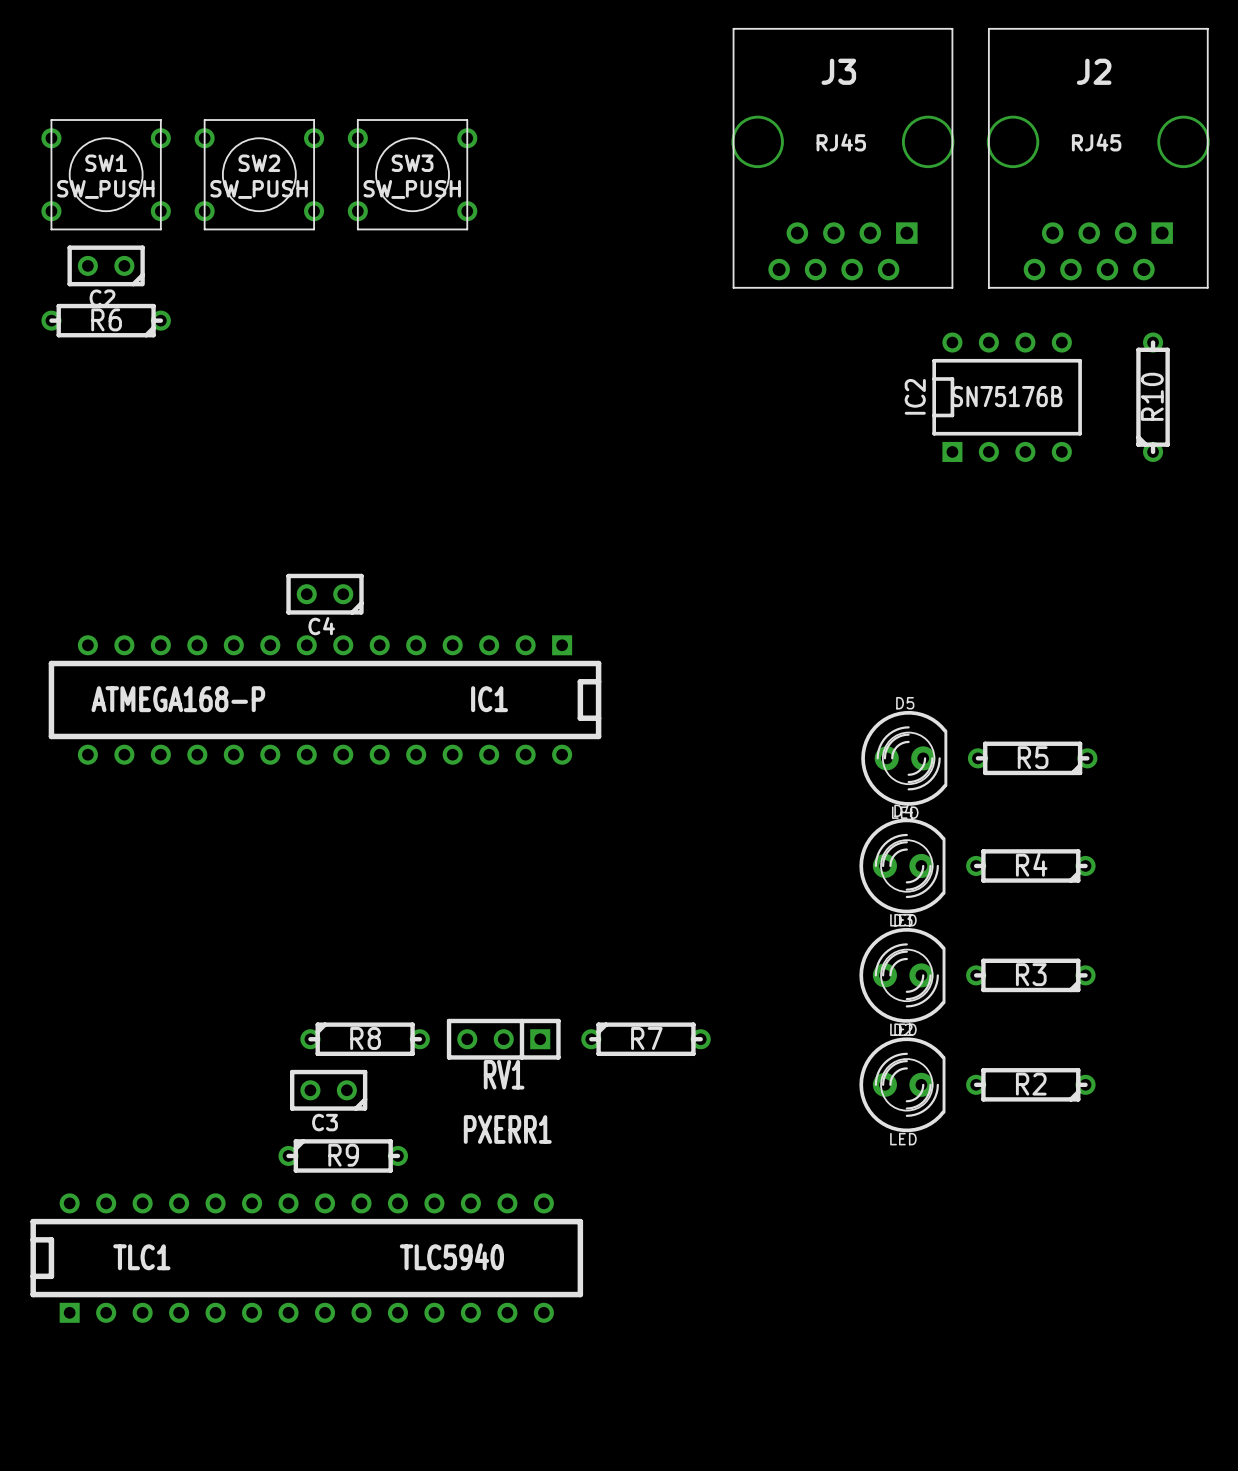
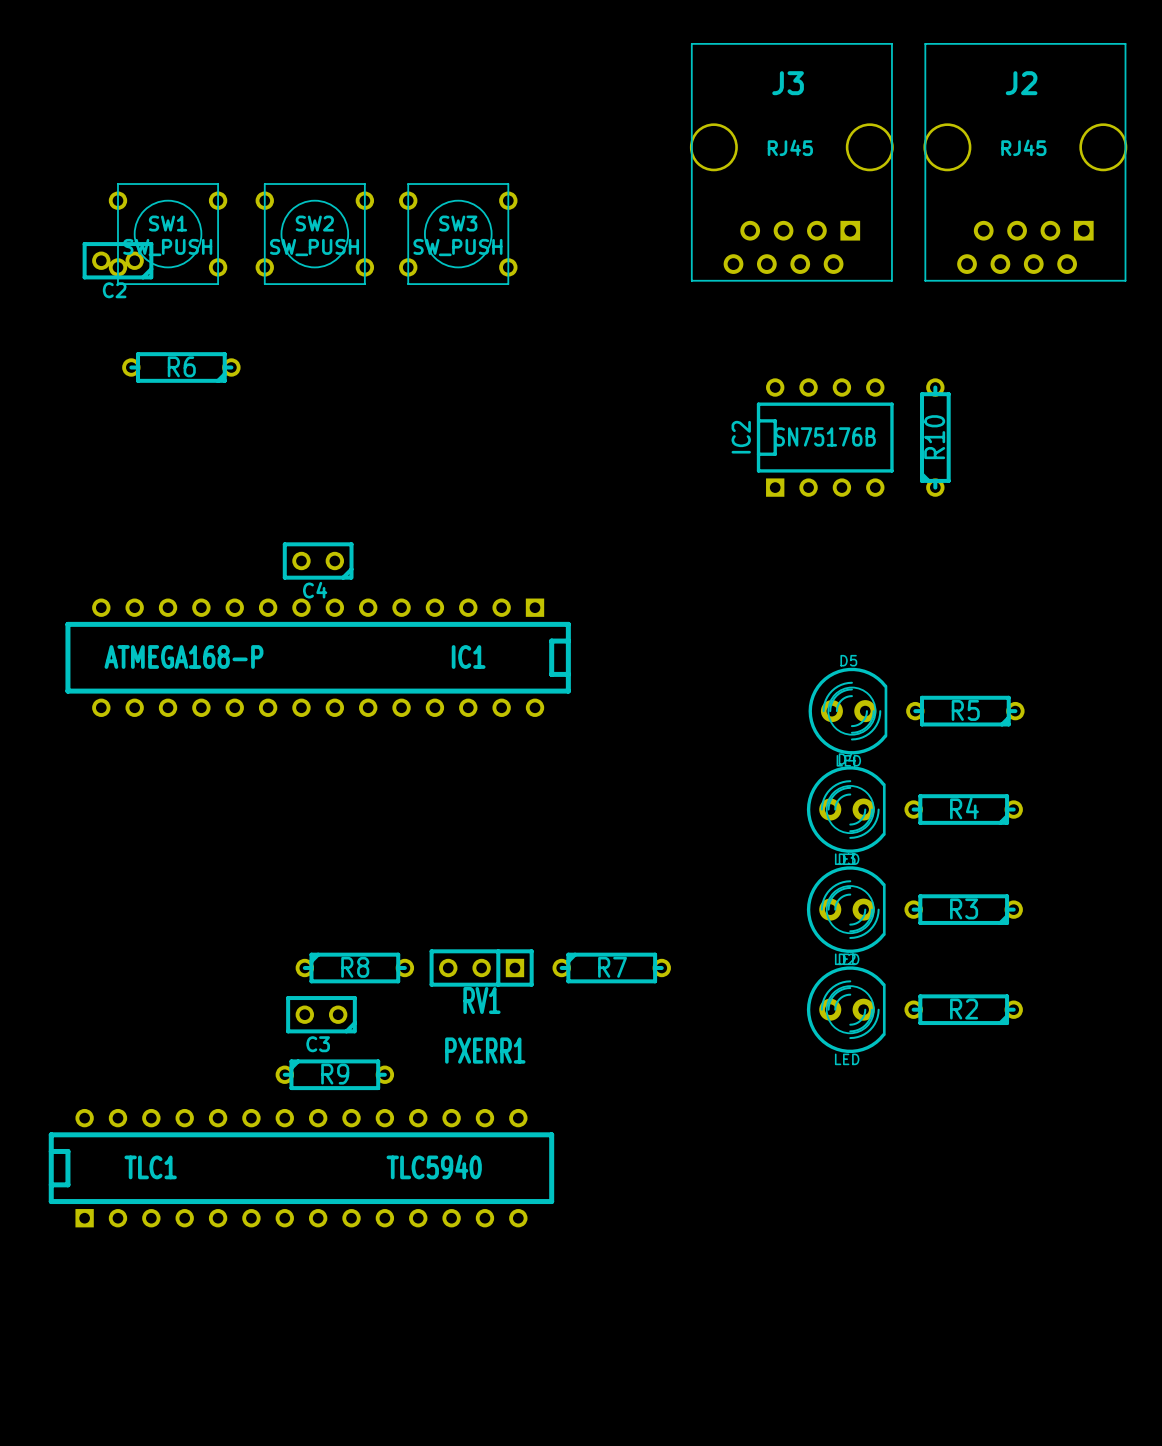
SW1 position: (106, 174) -> (168, 234)
SW2 position: (259, 174) -> (314, 234)
SW3 position: (412, 174) -> (458, 234)
R6 position: (106, 320) -> (181, 367)
IC2 position: (1007, 397) -> (825, 437)
R10 position: (1153, 397) -> (935, 437)

